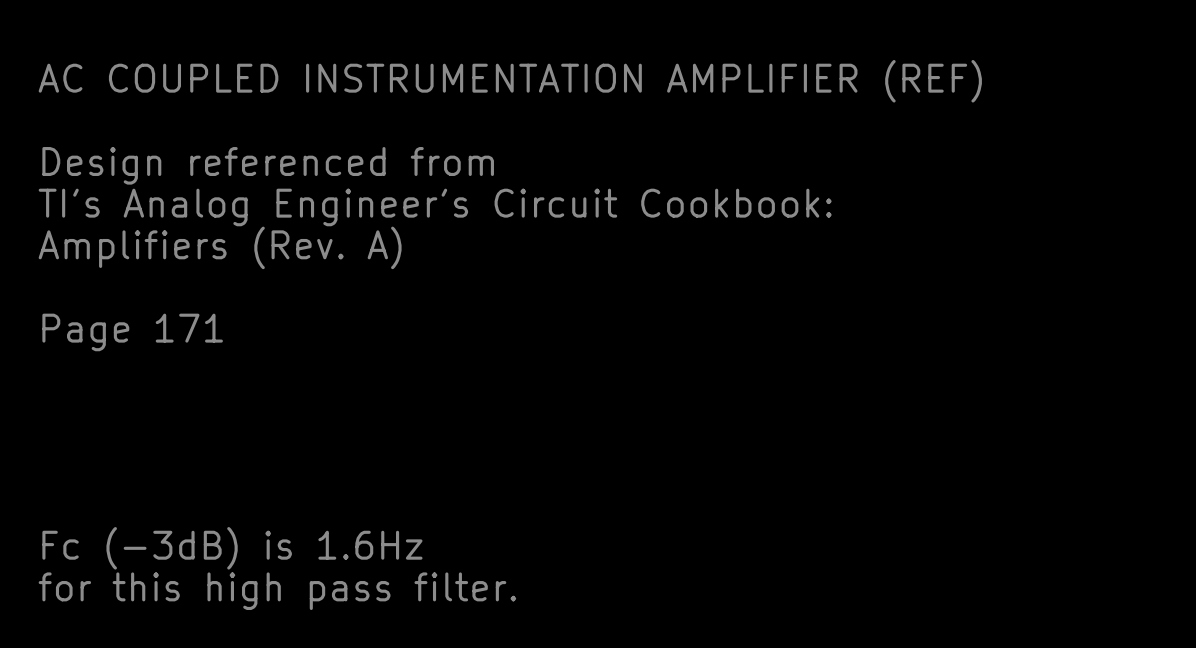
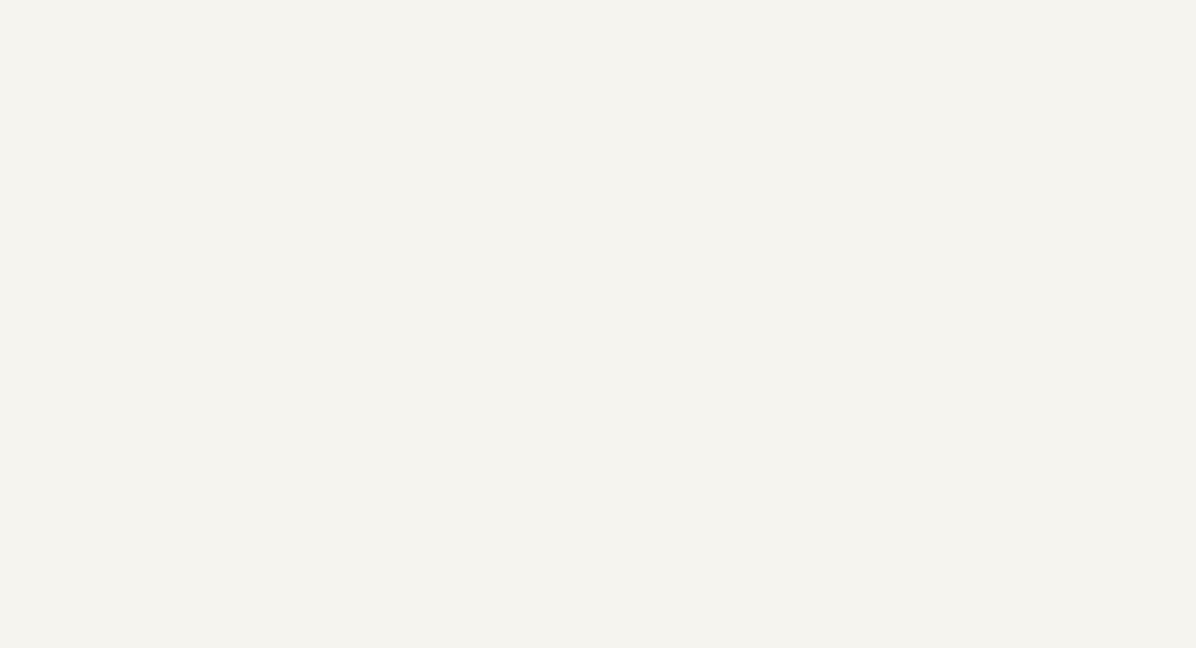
text: AC COUPLED INSTRUMENTATION AMPLIFIER (REF) (510, 81) -> none
text: Design referenced from (268, 165) -> none
text: TI's Analog Engineer's Circuit Cookbook: (435, 207) -> none
text: Amplifiers (Rev. A) (220, 247) -> none
text: Page 171 (132, 332) -> none
text: Fc (-3dB) is 1.6Hz (232, 548) -> none
text: for this high pass filter. (277, 591) -> none

